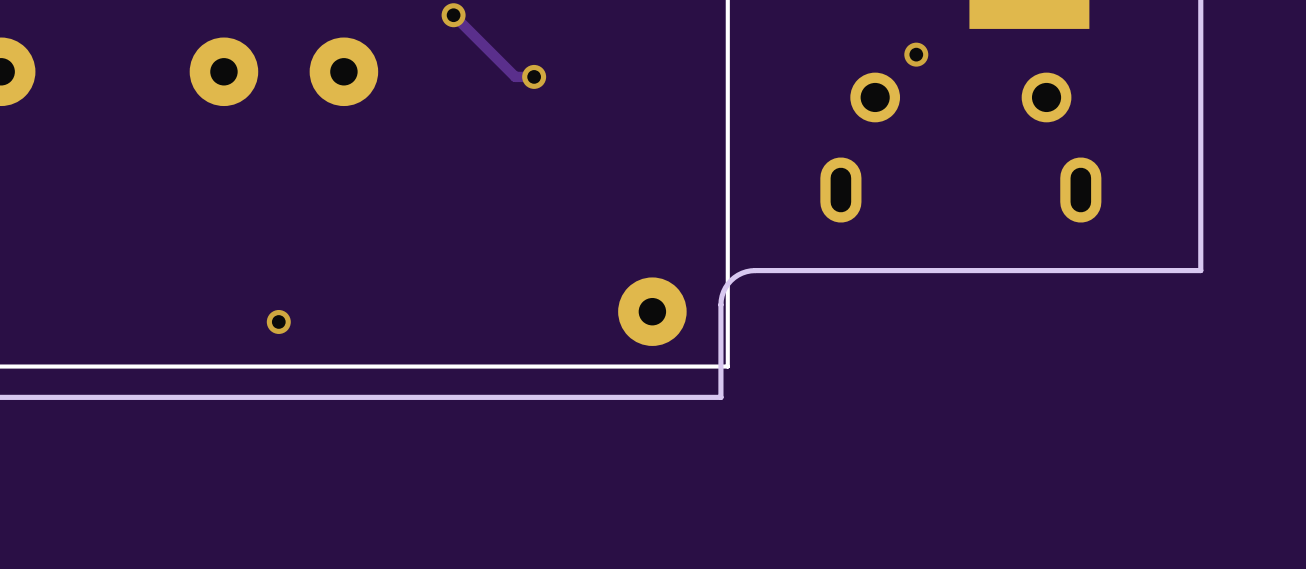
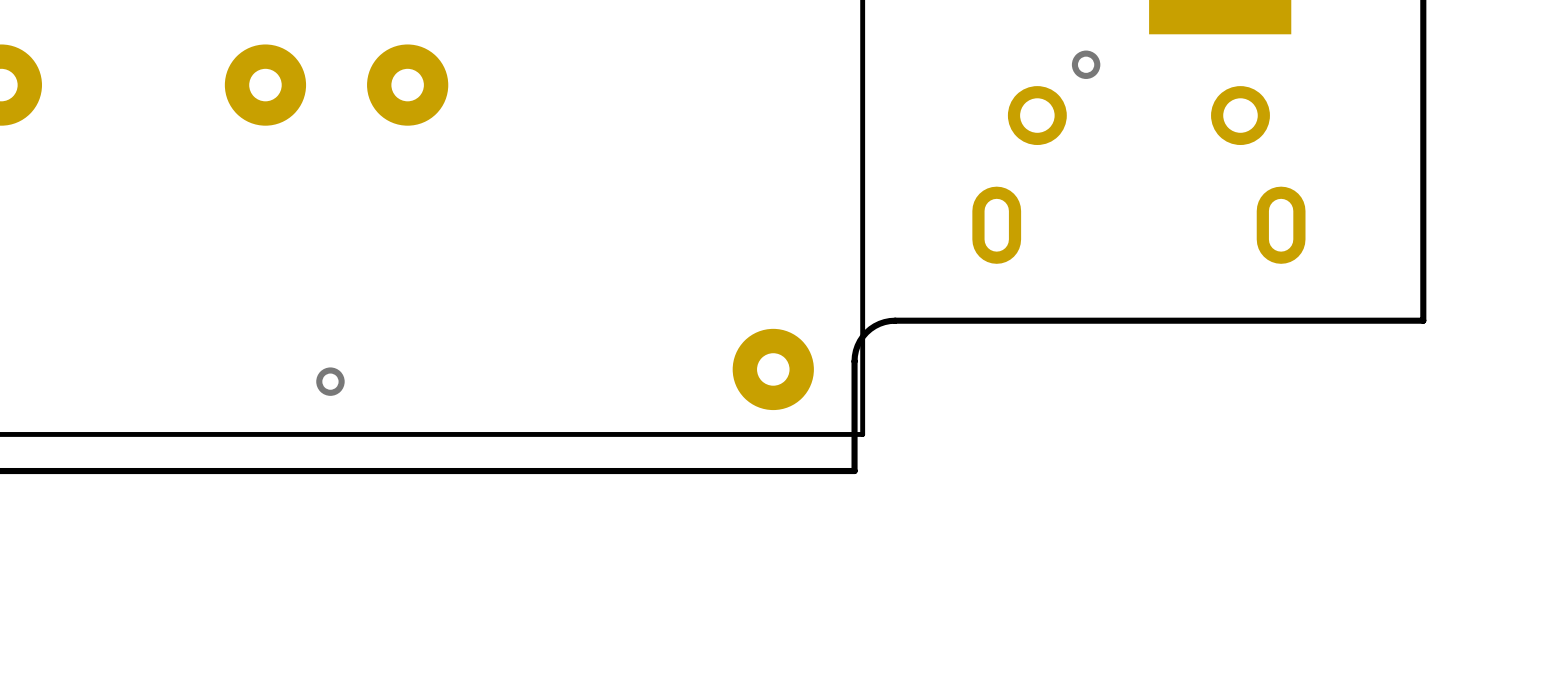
track: (453, 15) (515, 76) (534, 76) -> none
via: (453, 15) -> none
via: (534, 76) -> none

